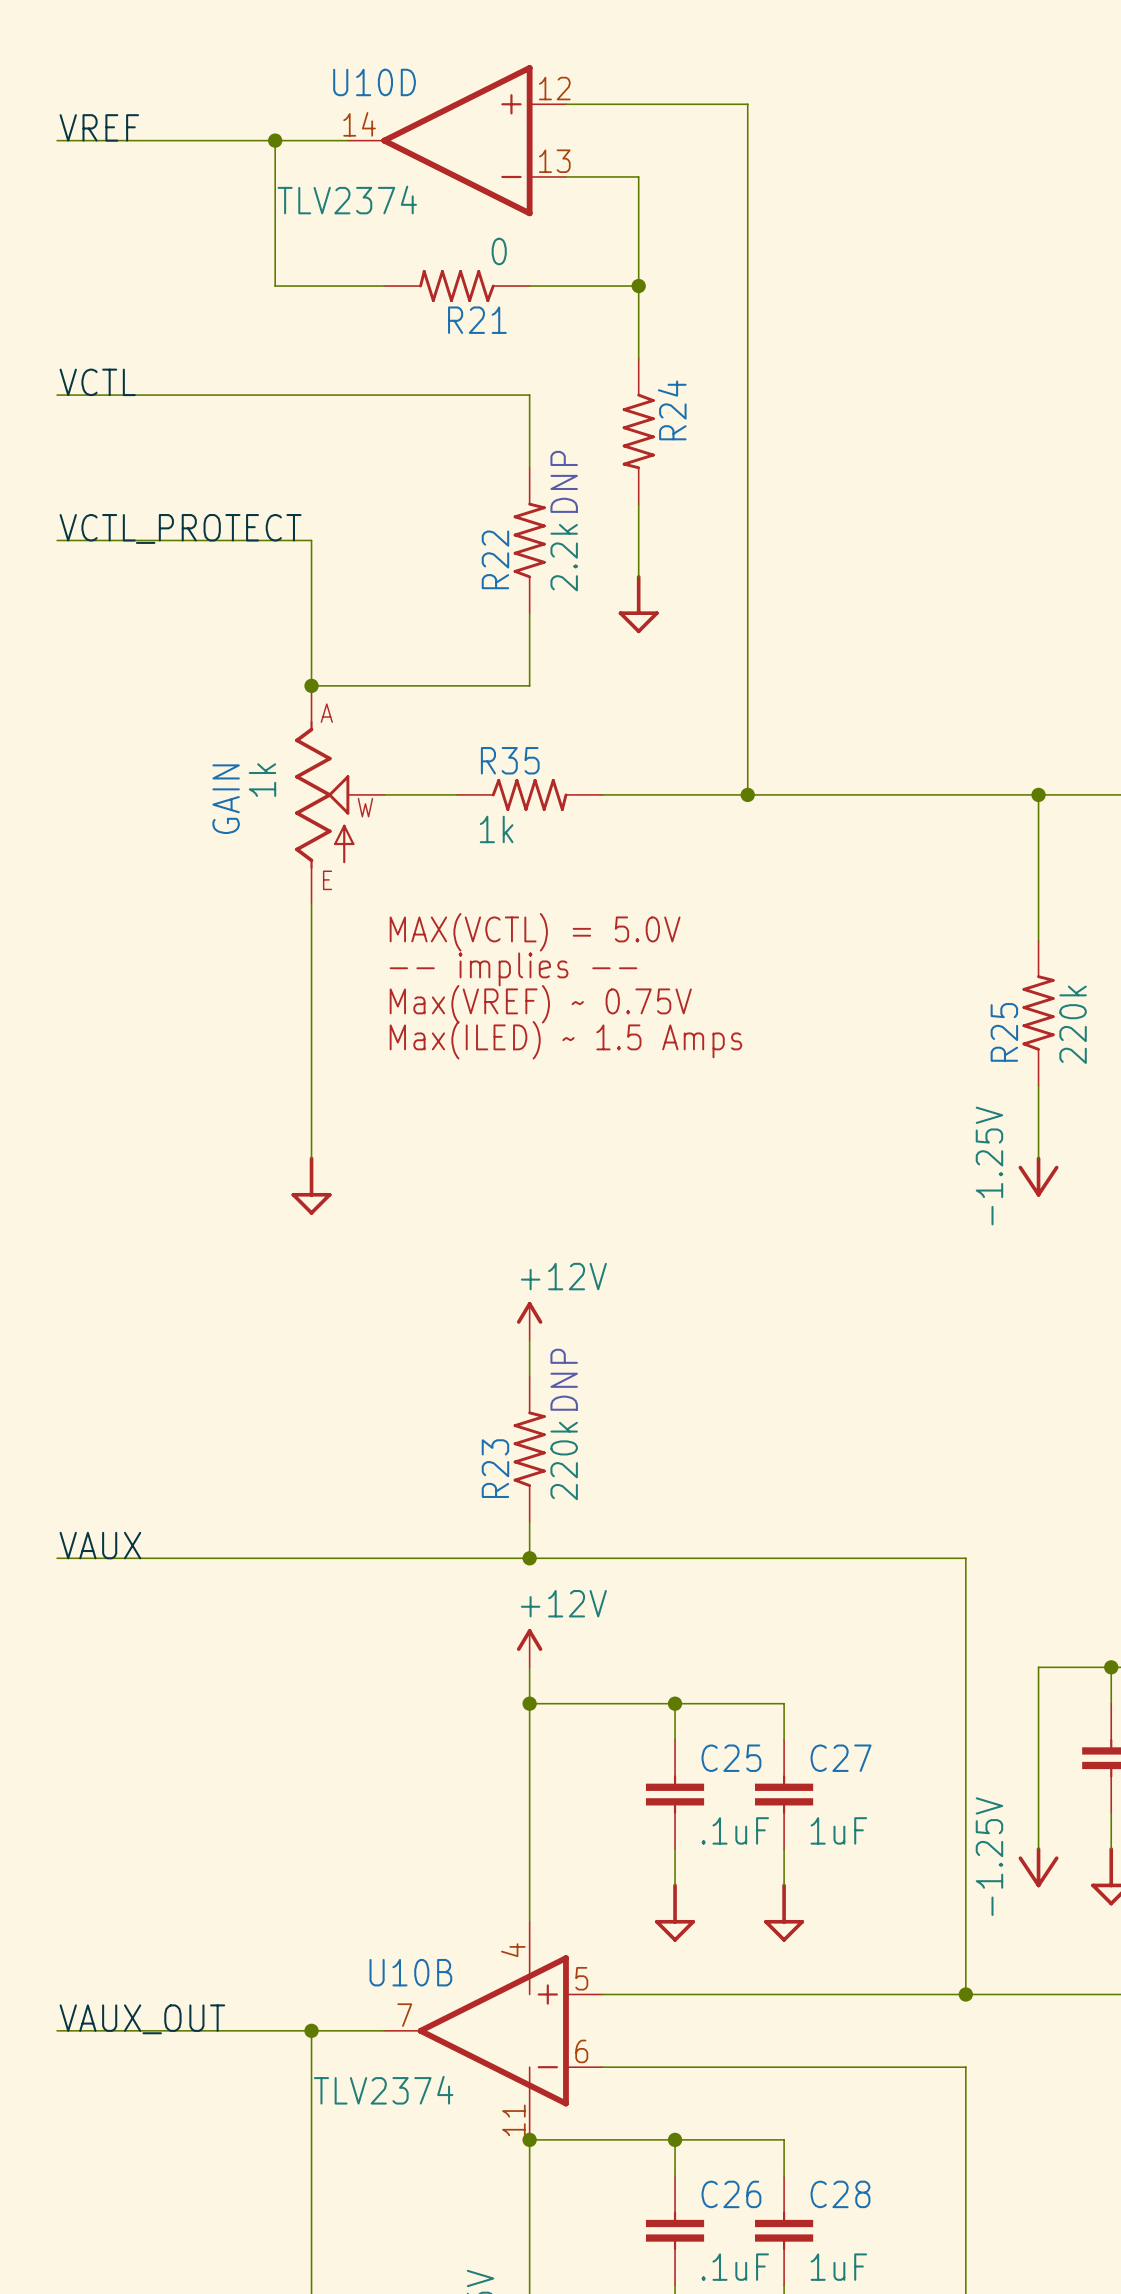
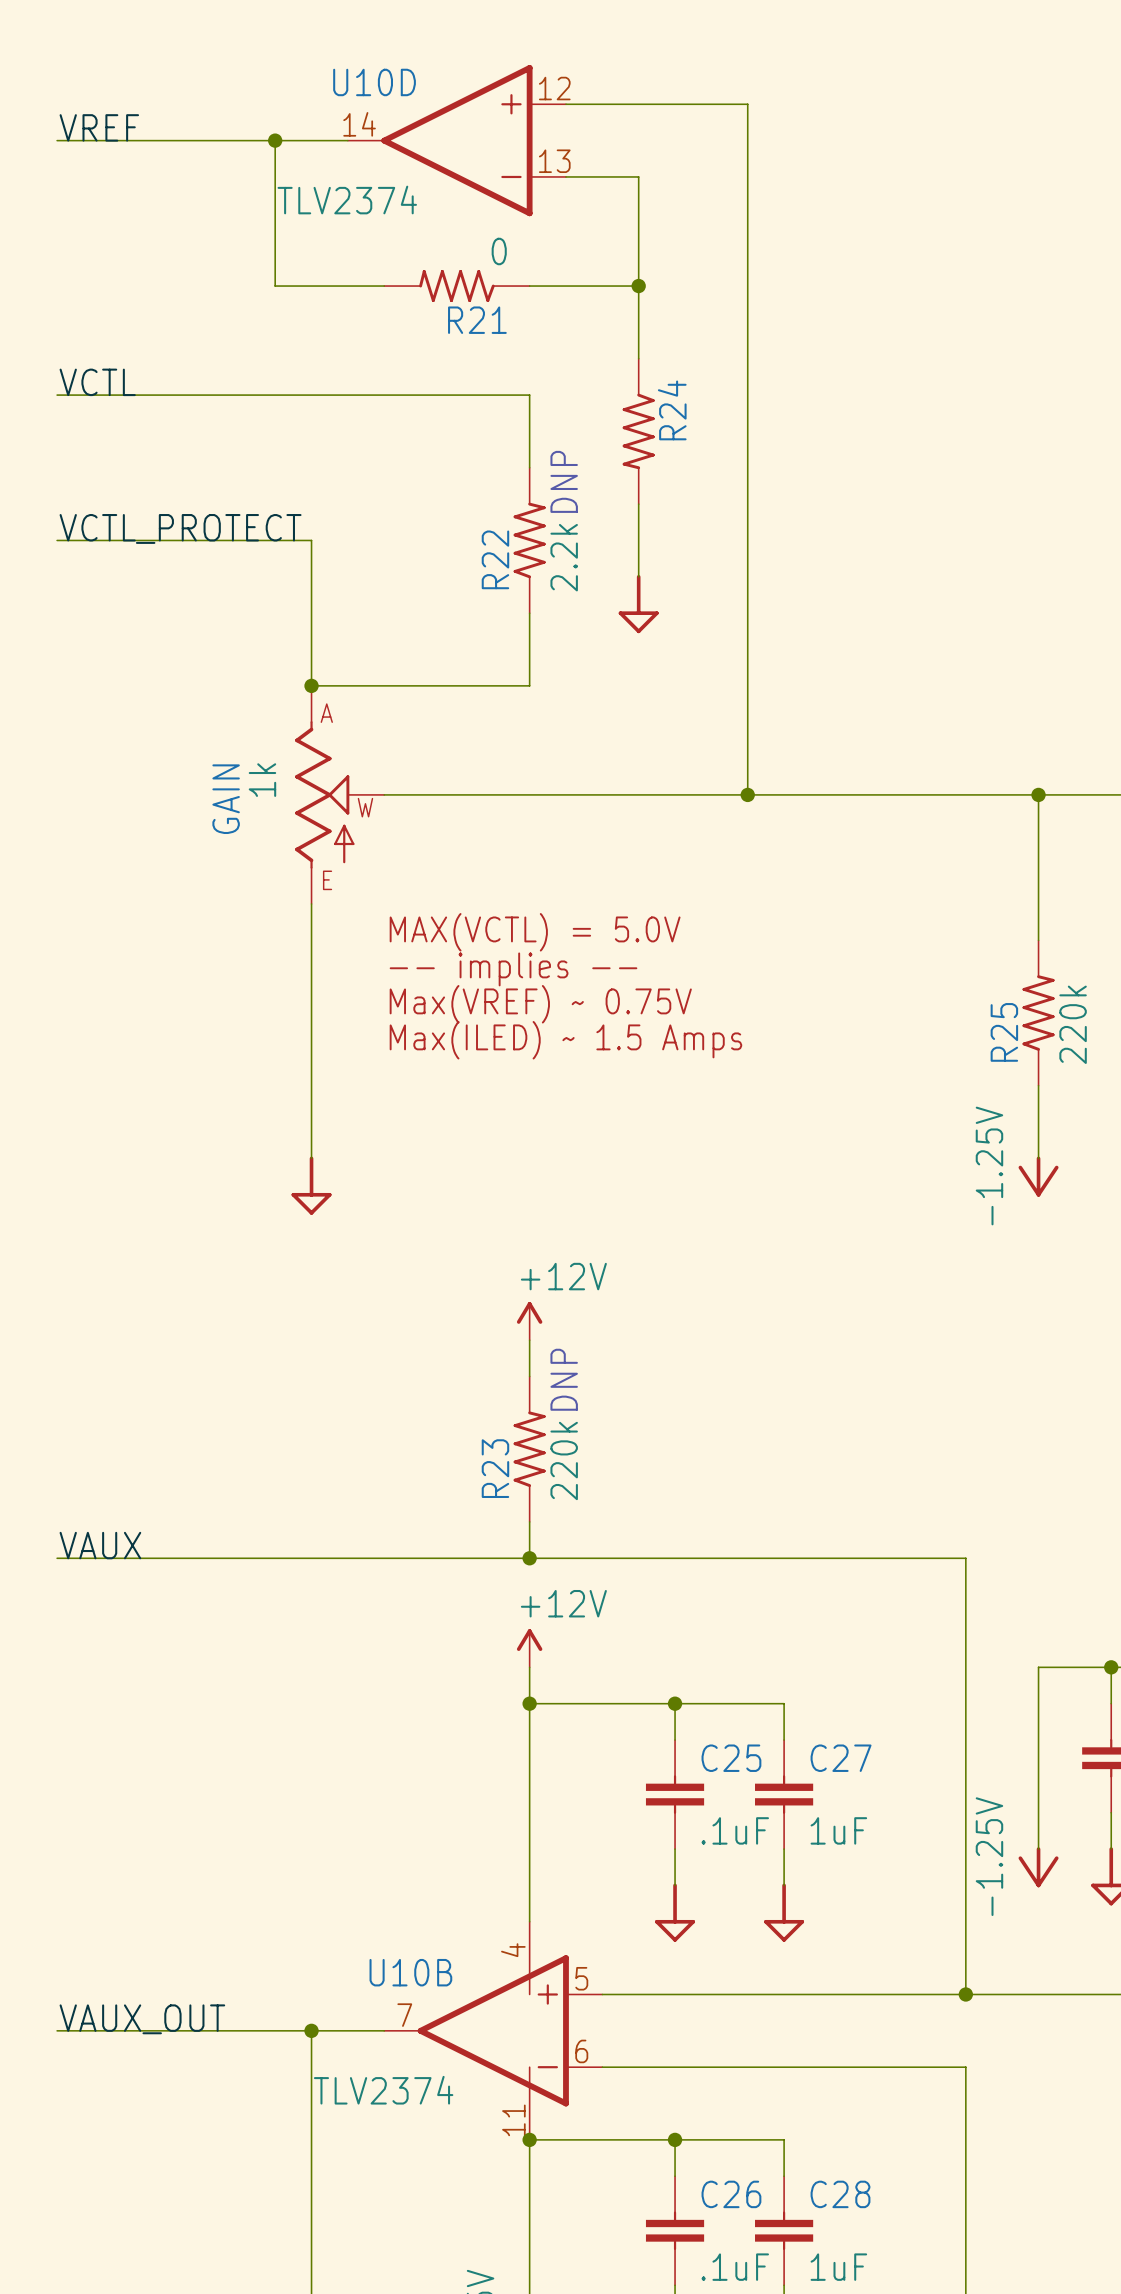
R35: 1k (529, 794) -> none

